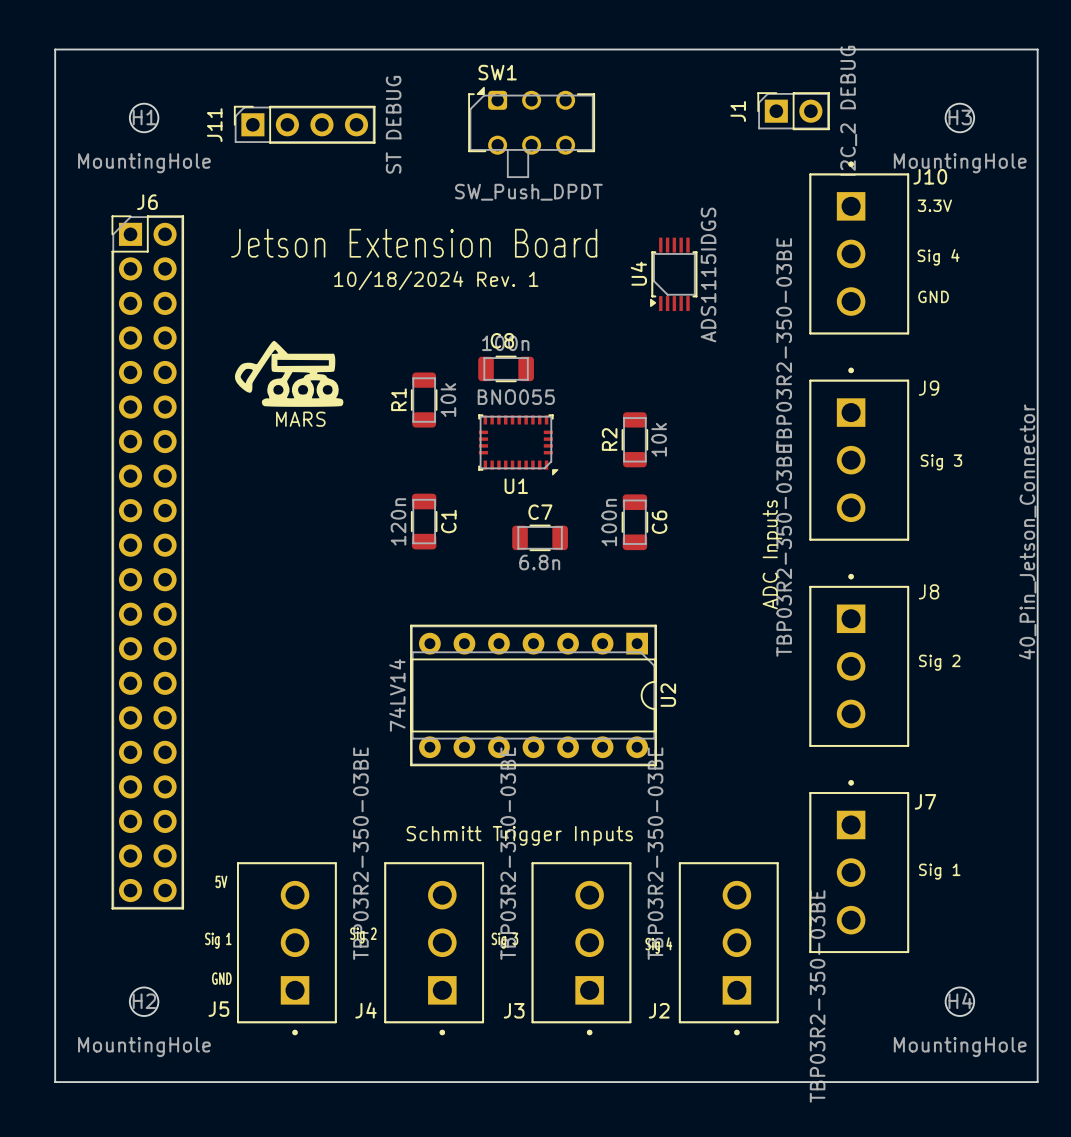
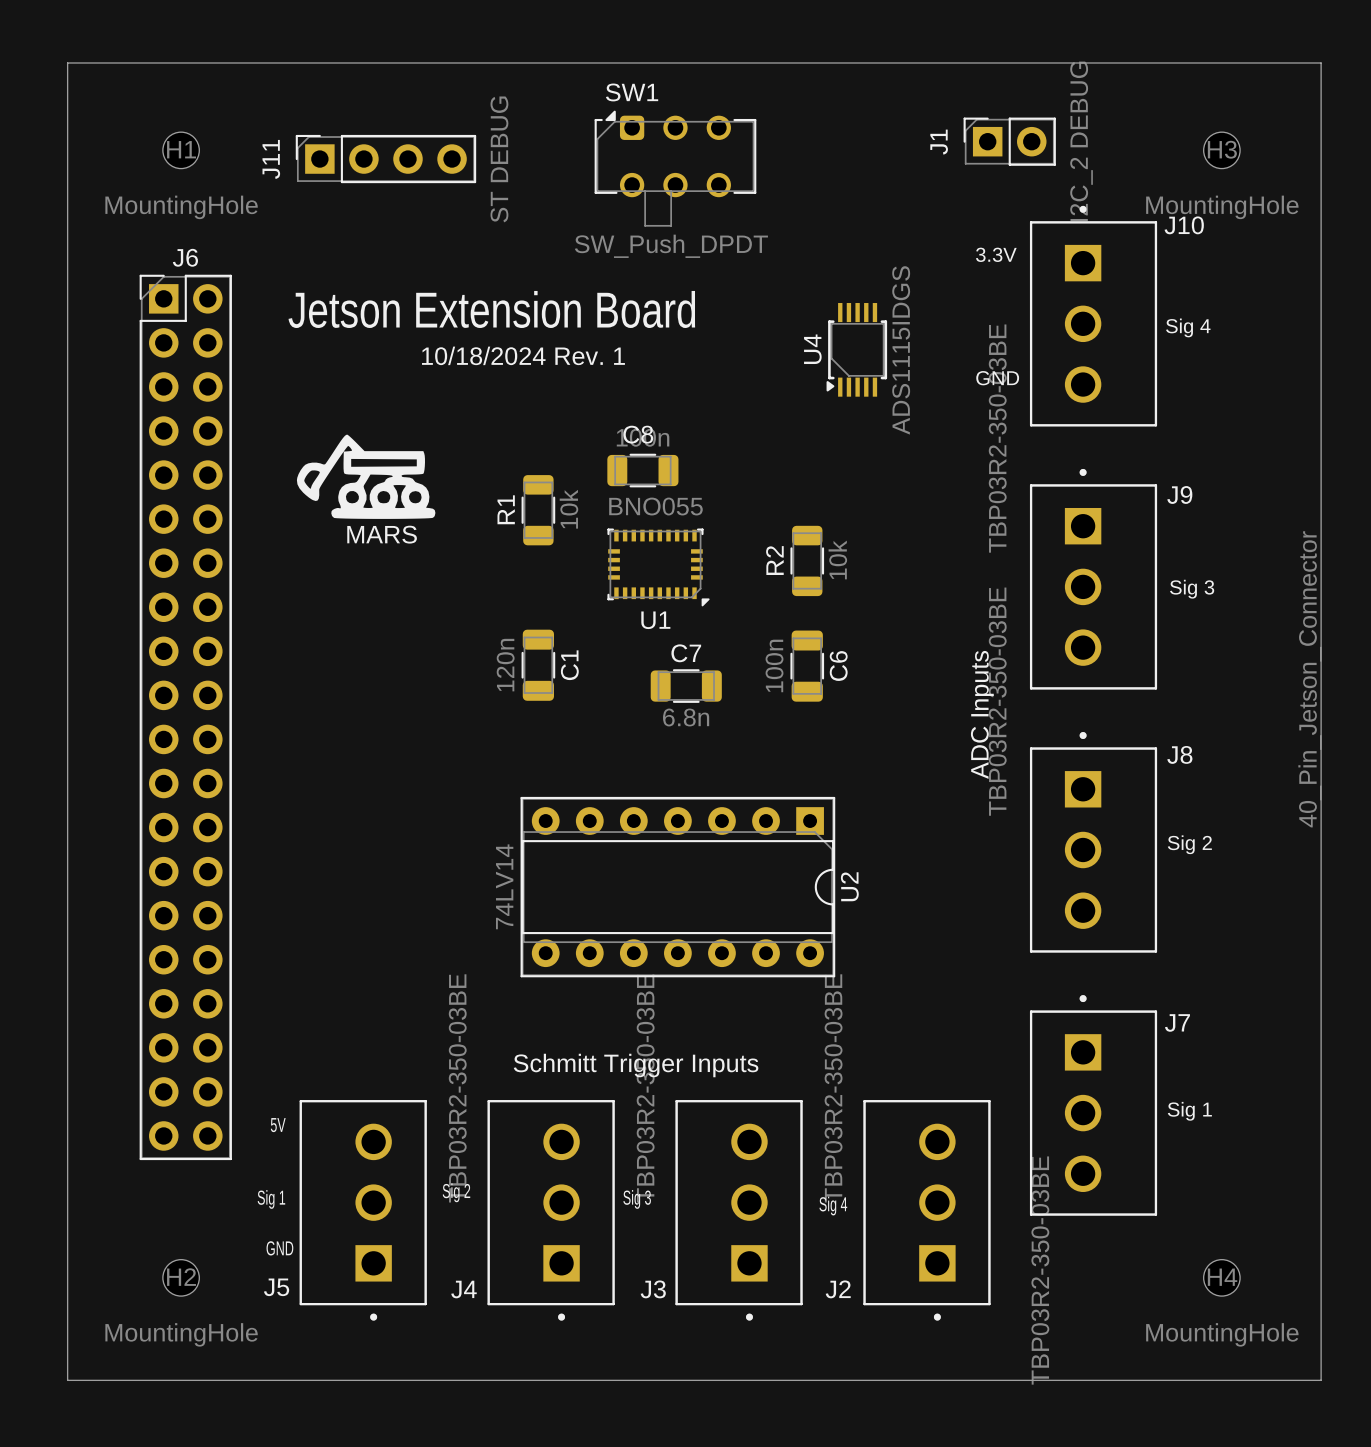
text position: 3.3V (934, 205) -> 3.3V (996, 254)
text position: GND (933, 296) -> GND (997, 378)

